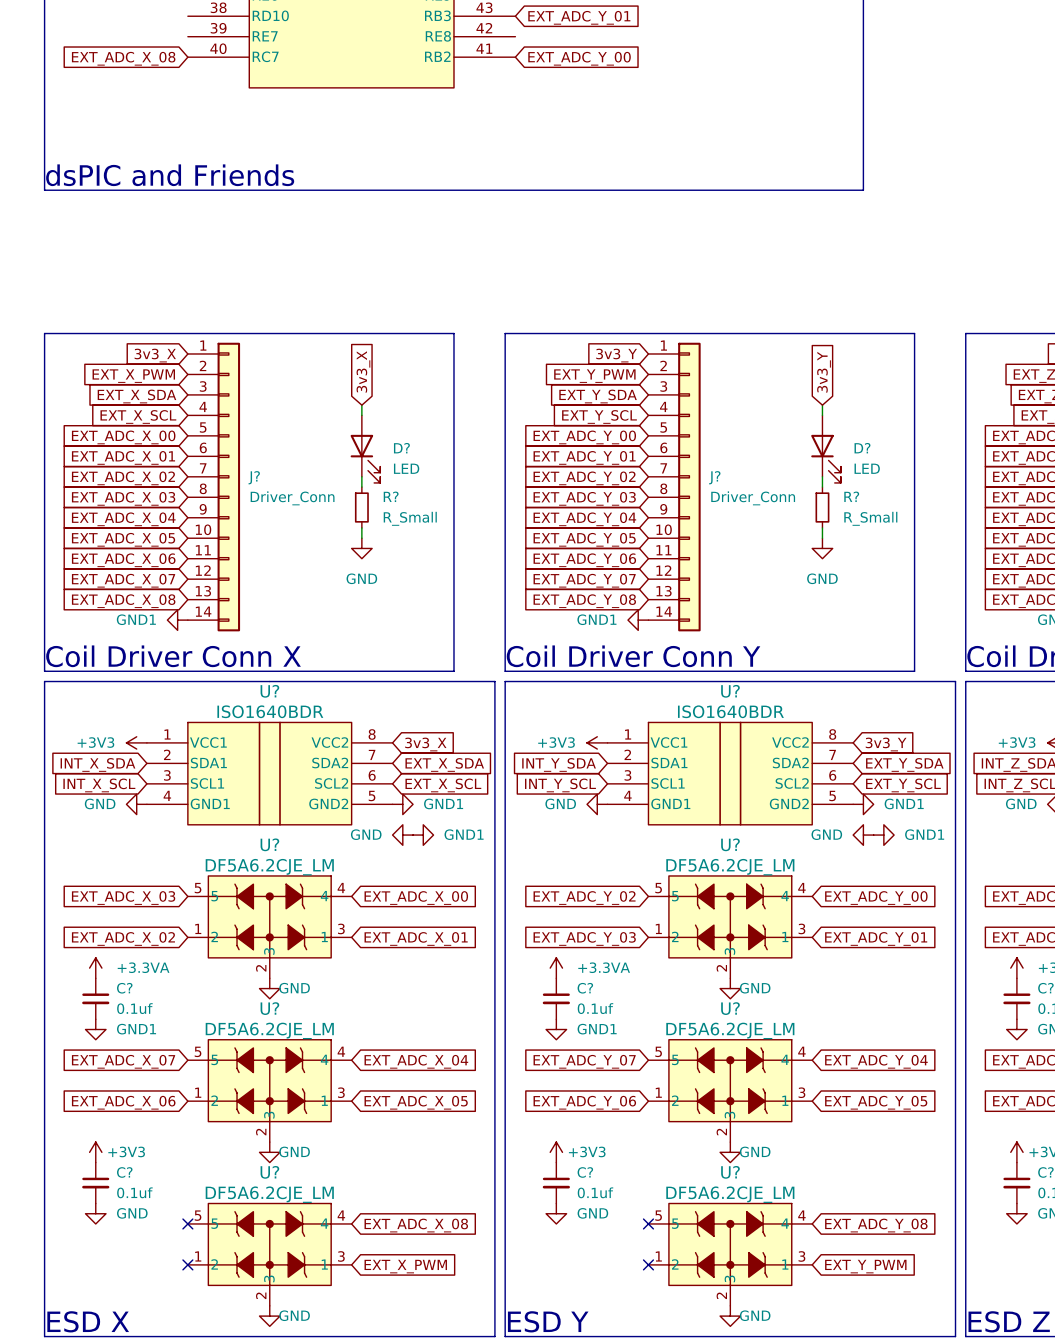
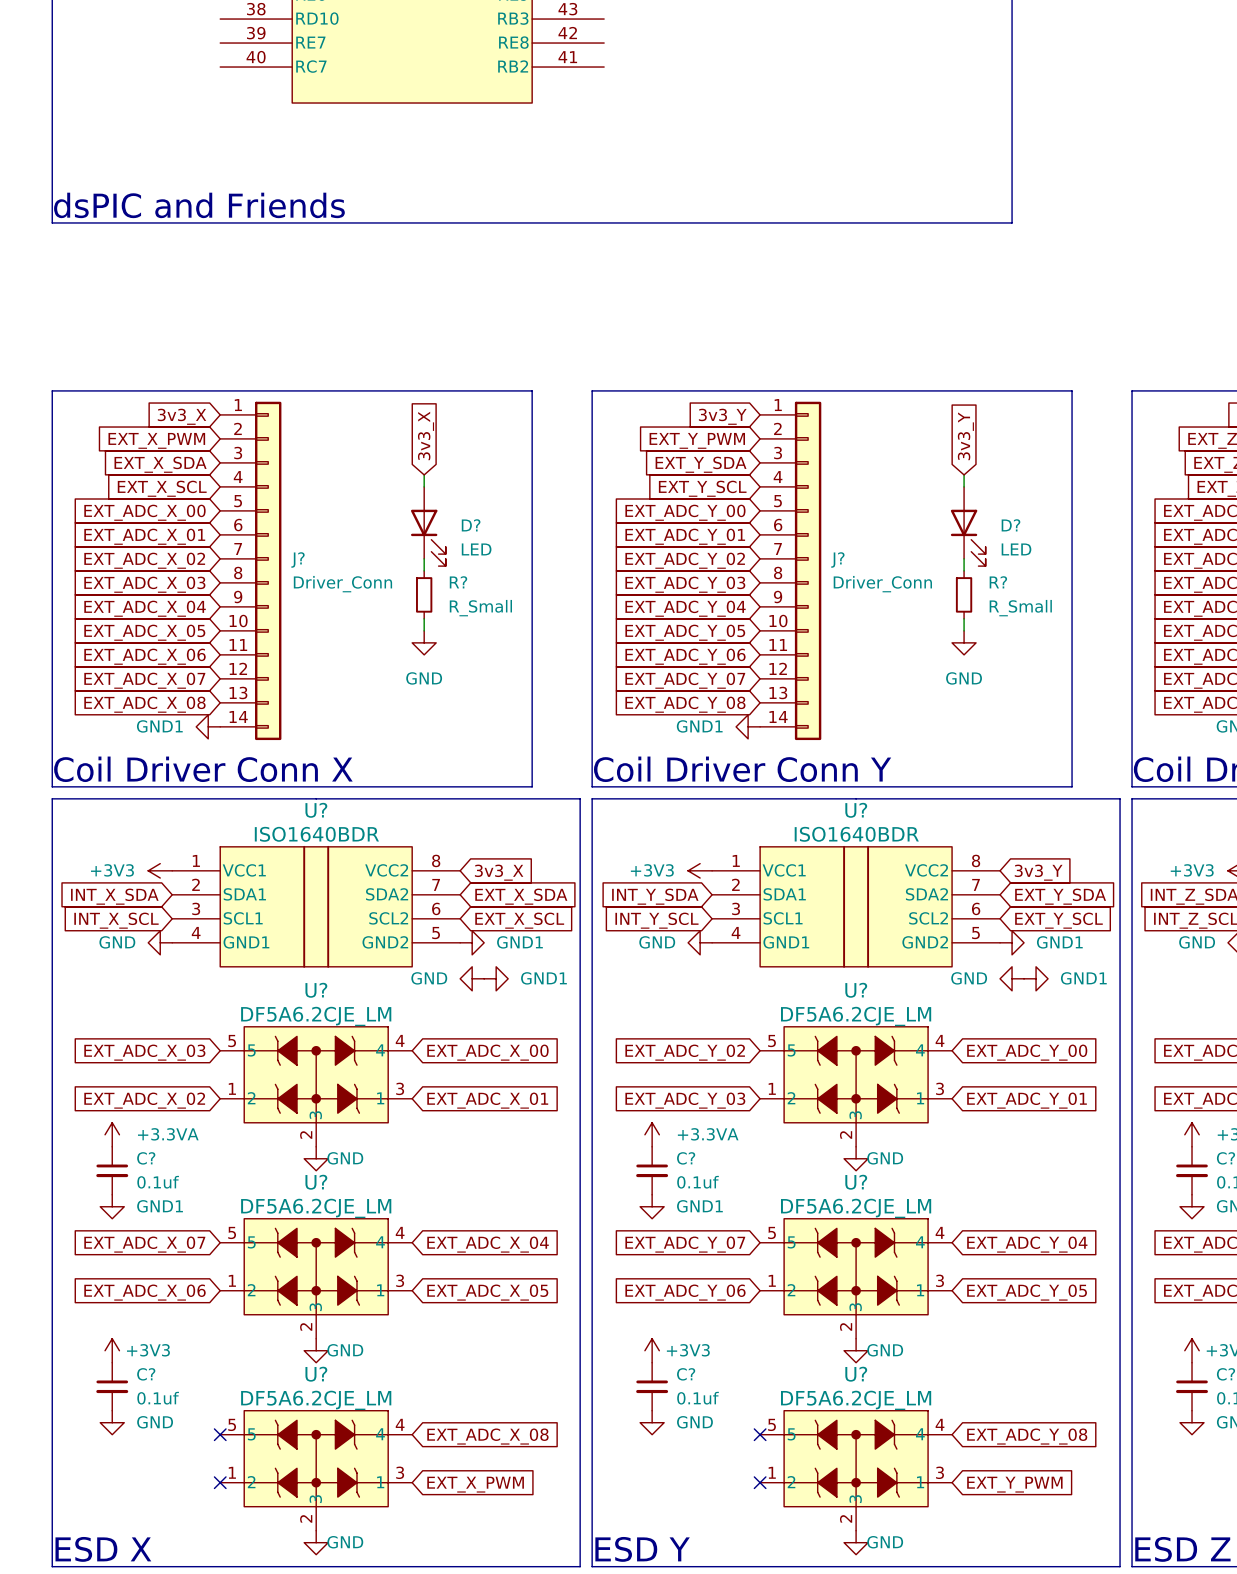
global label: EXT_ADC_Y_01 (579, 17) -> none
global label: EXT_ADC_X_08 (123, 58) -> none
global label: EXT_ADC_Y_00 (579, 58) -> none

